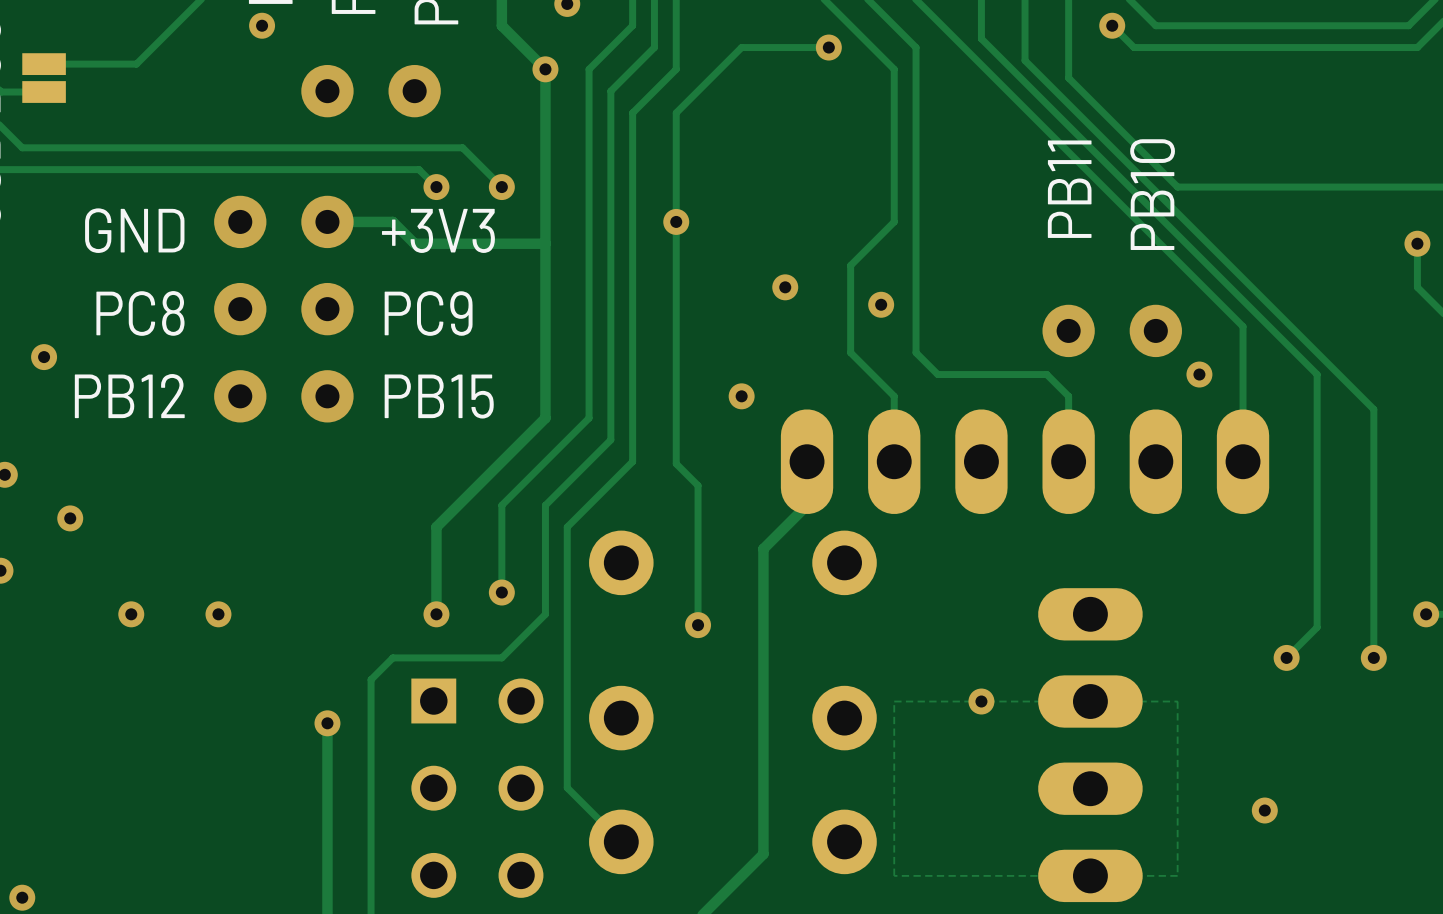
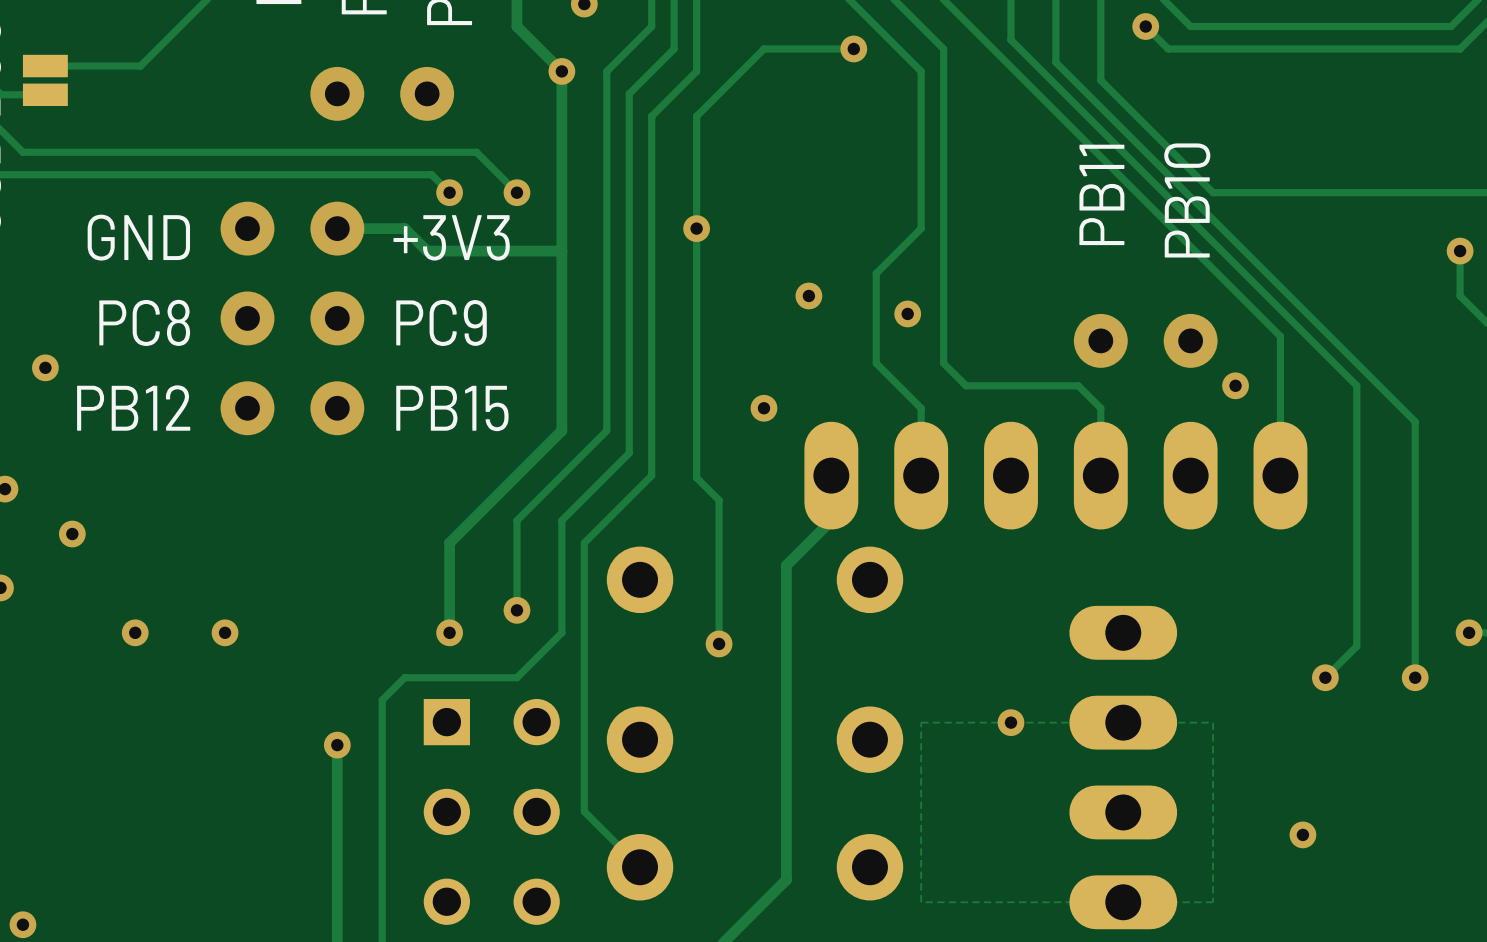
via: (262, 25) -> none

